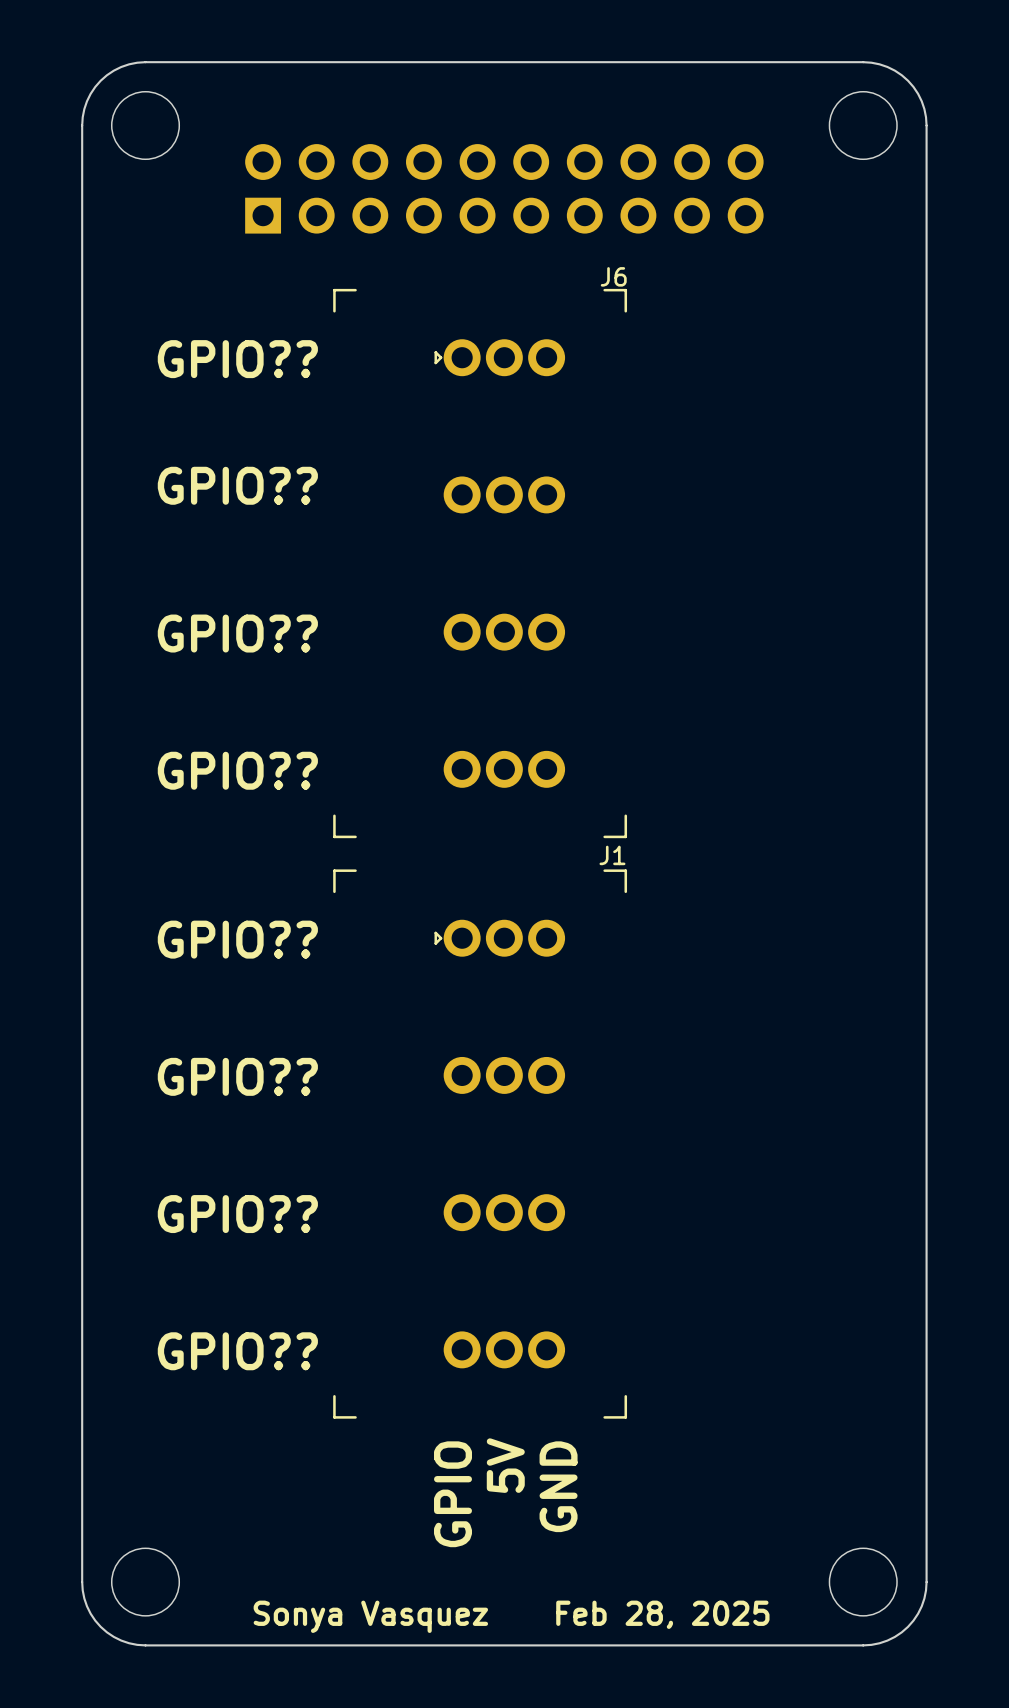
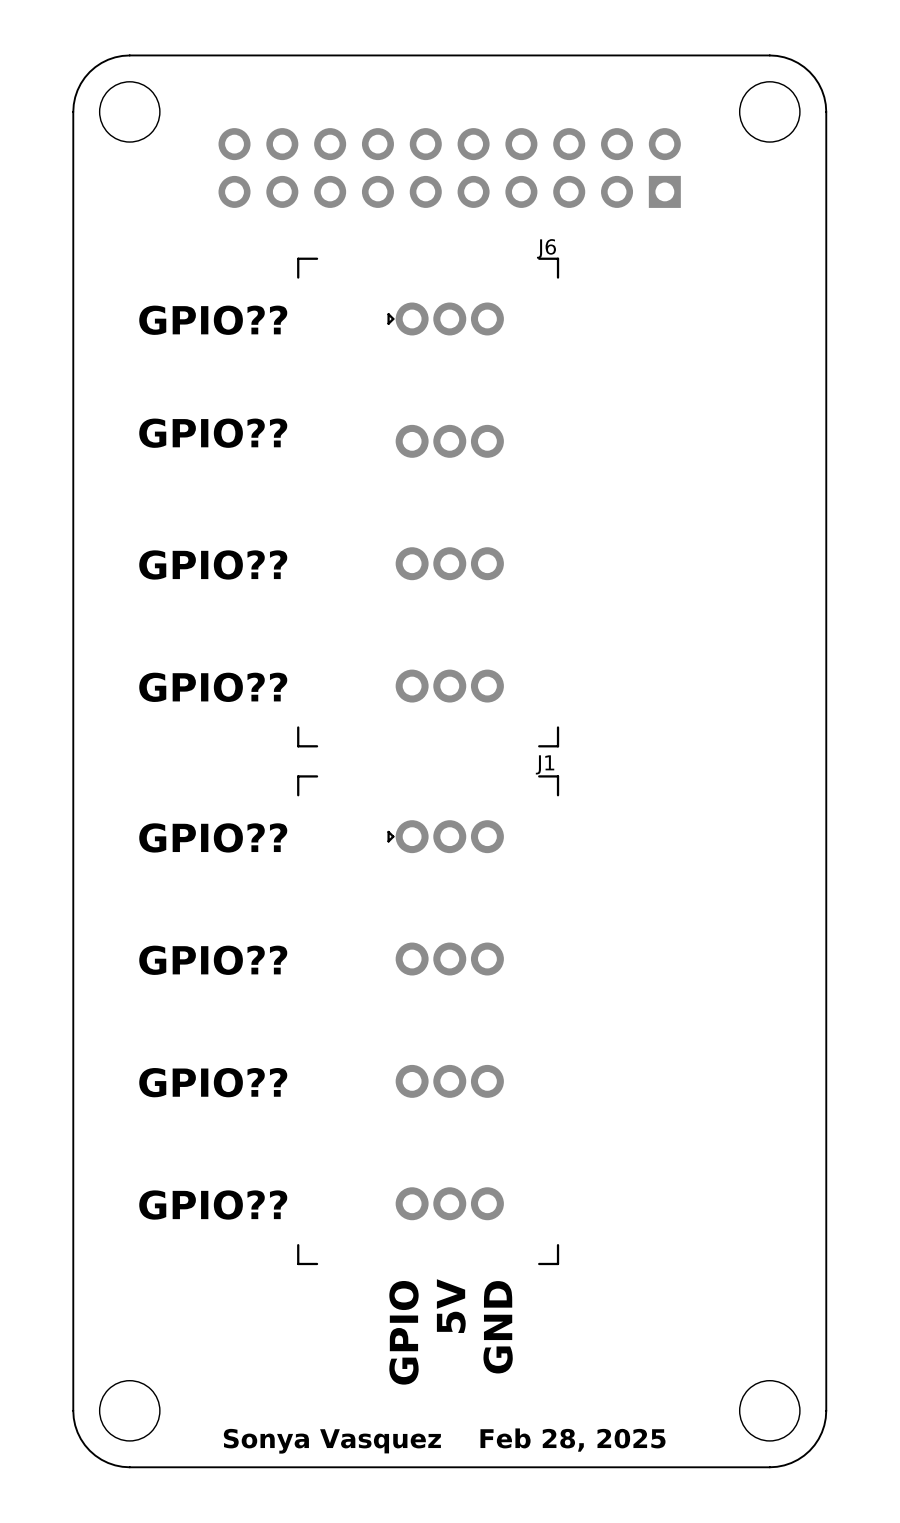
part footprint: [245, 144, 764, 234] -> [218, 128, 681, 208]

